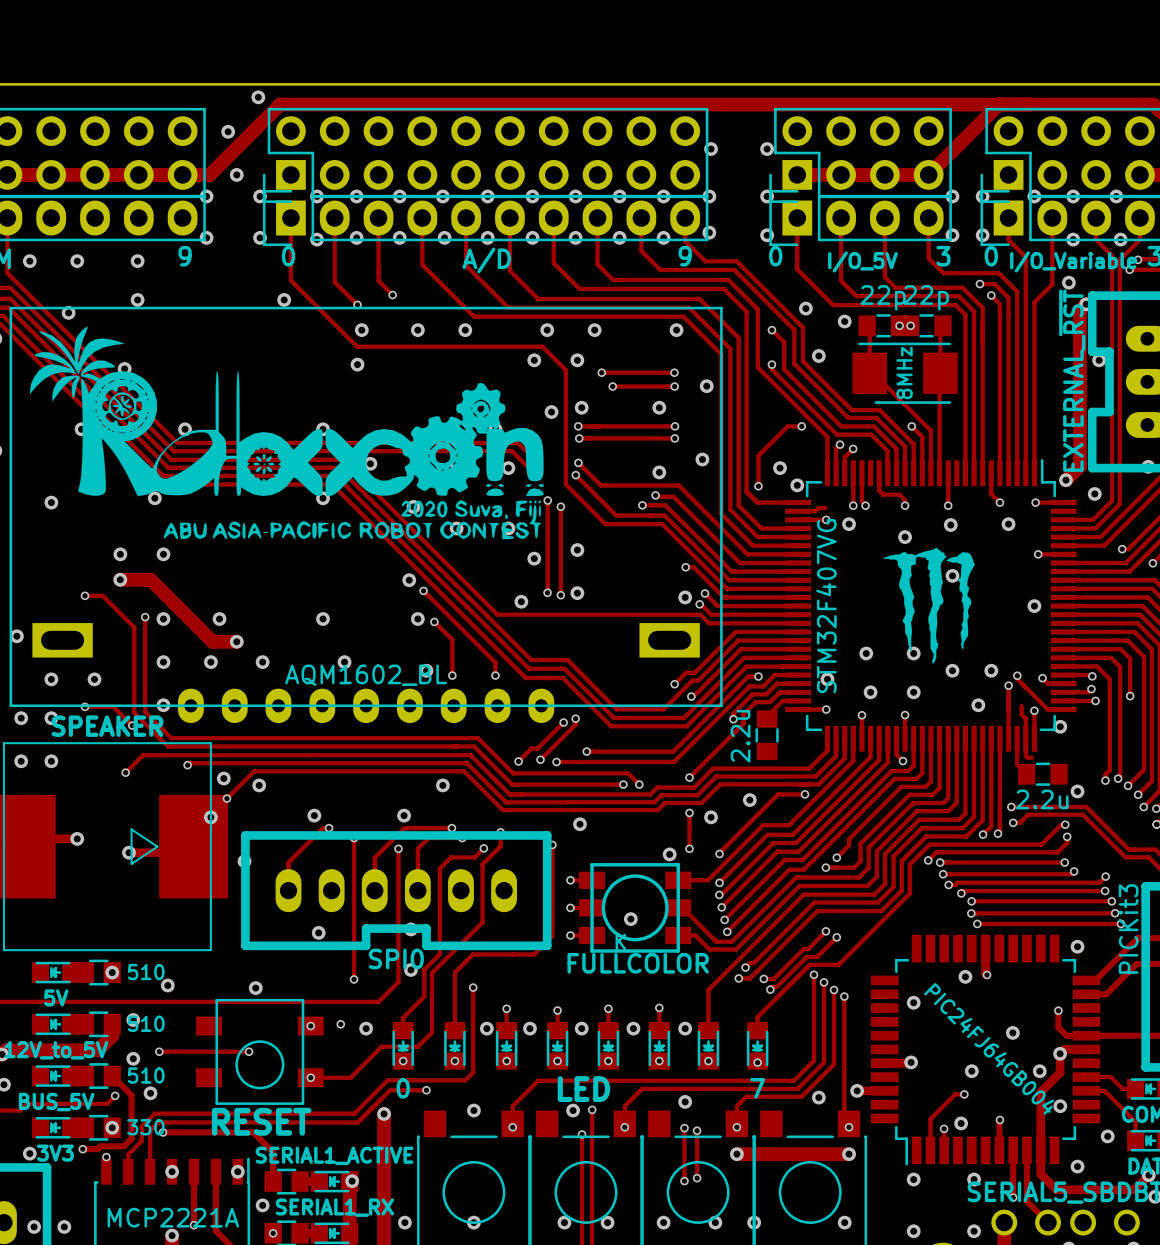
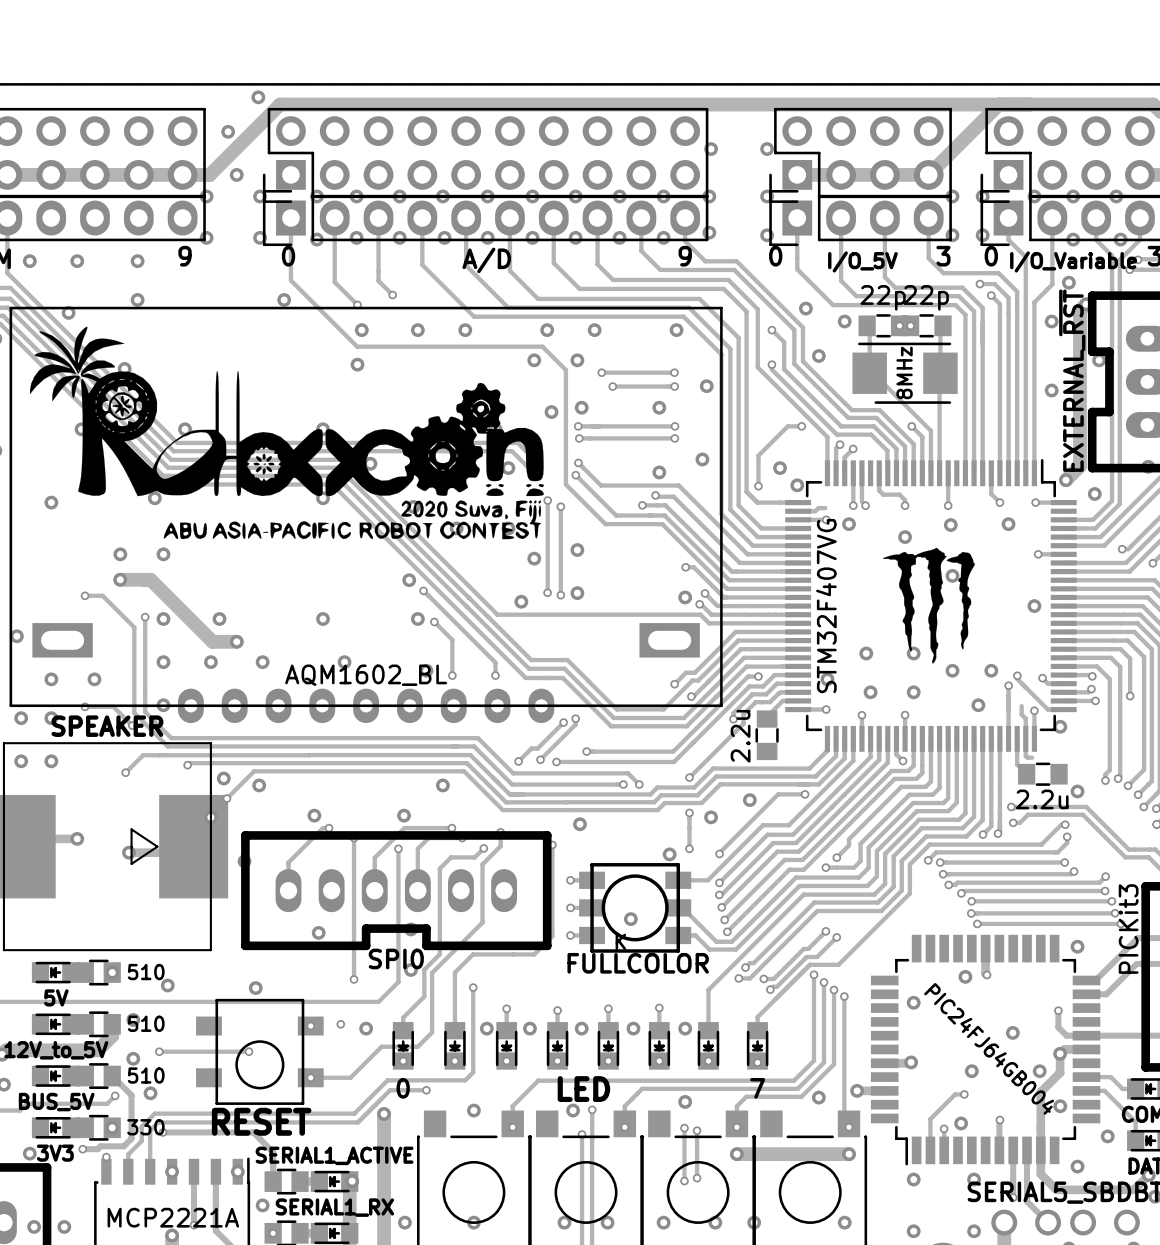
via: none -> (1051, 321)
via: none -> (1051, 390)

